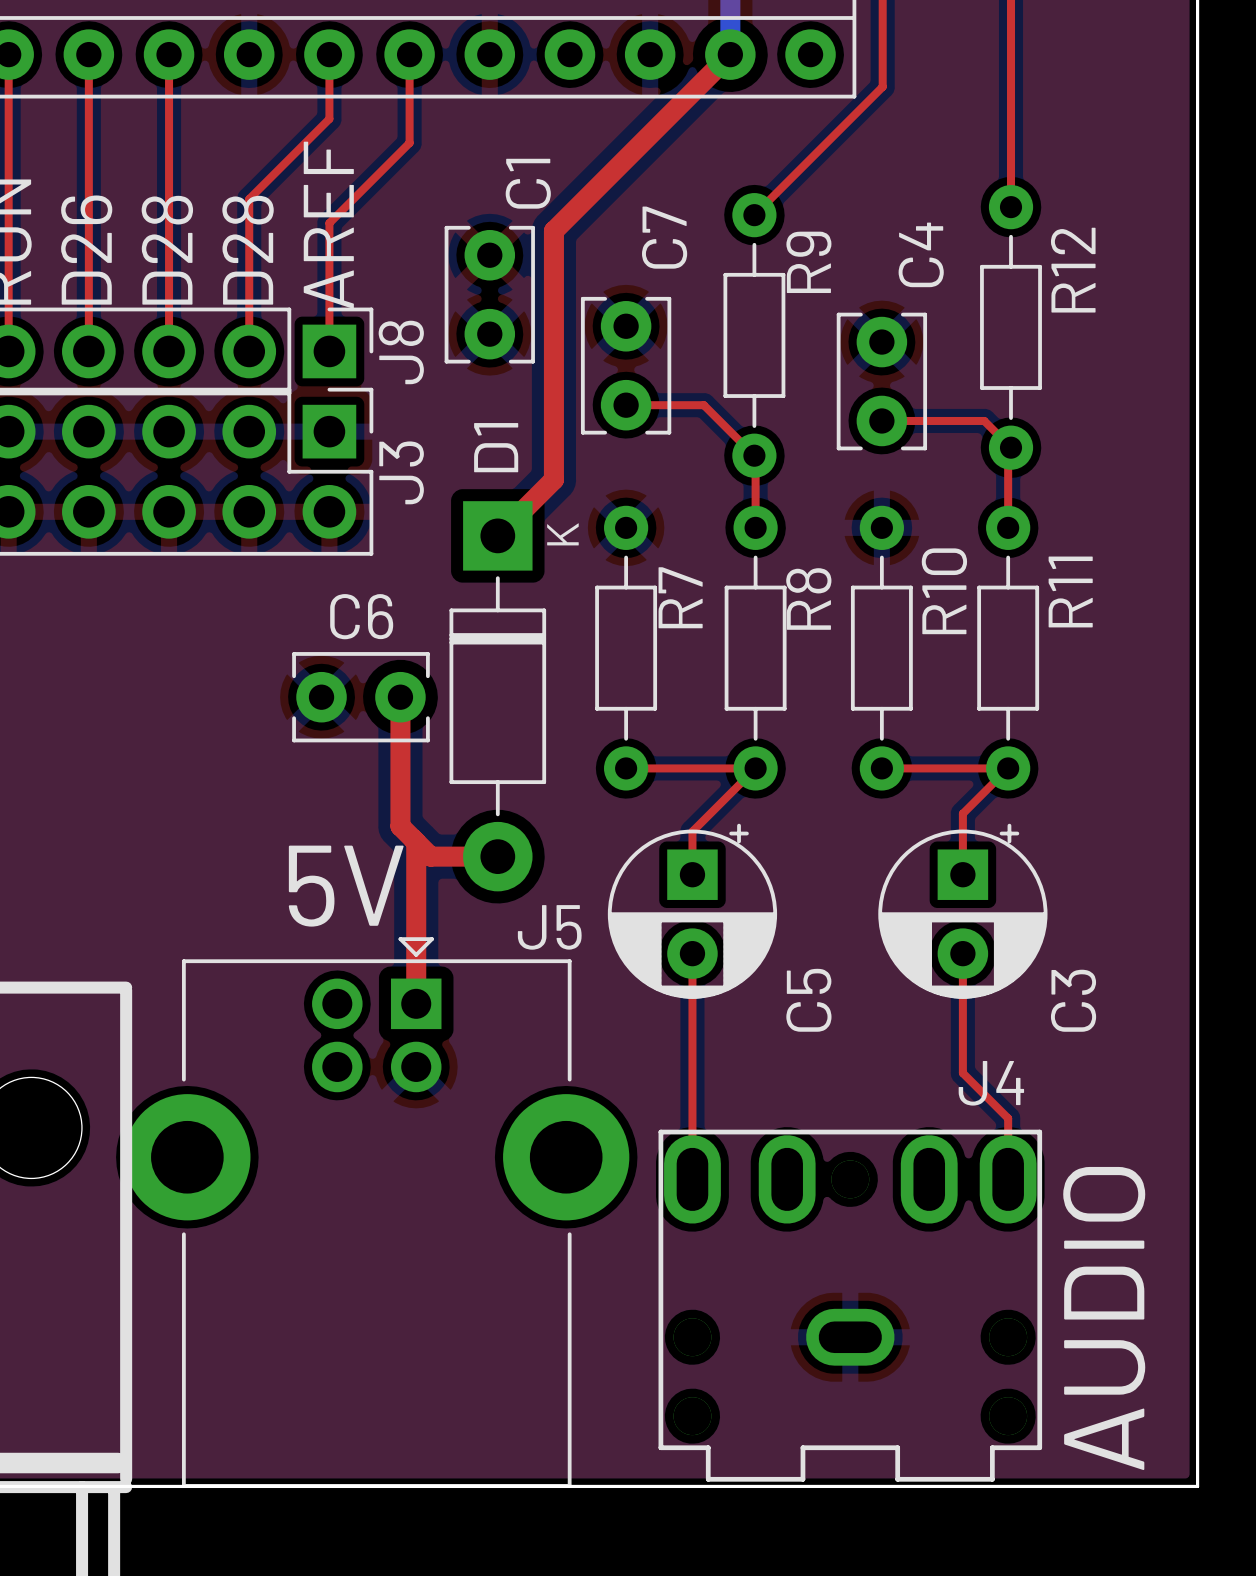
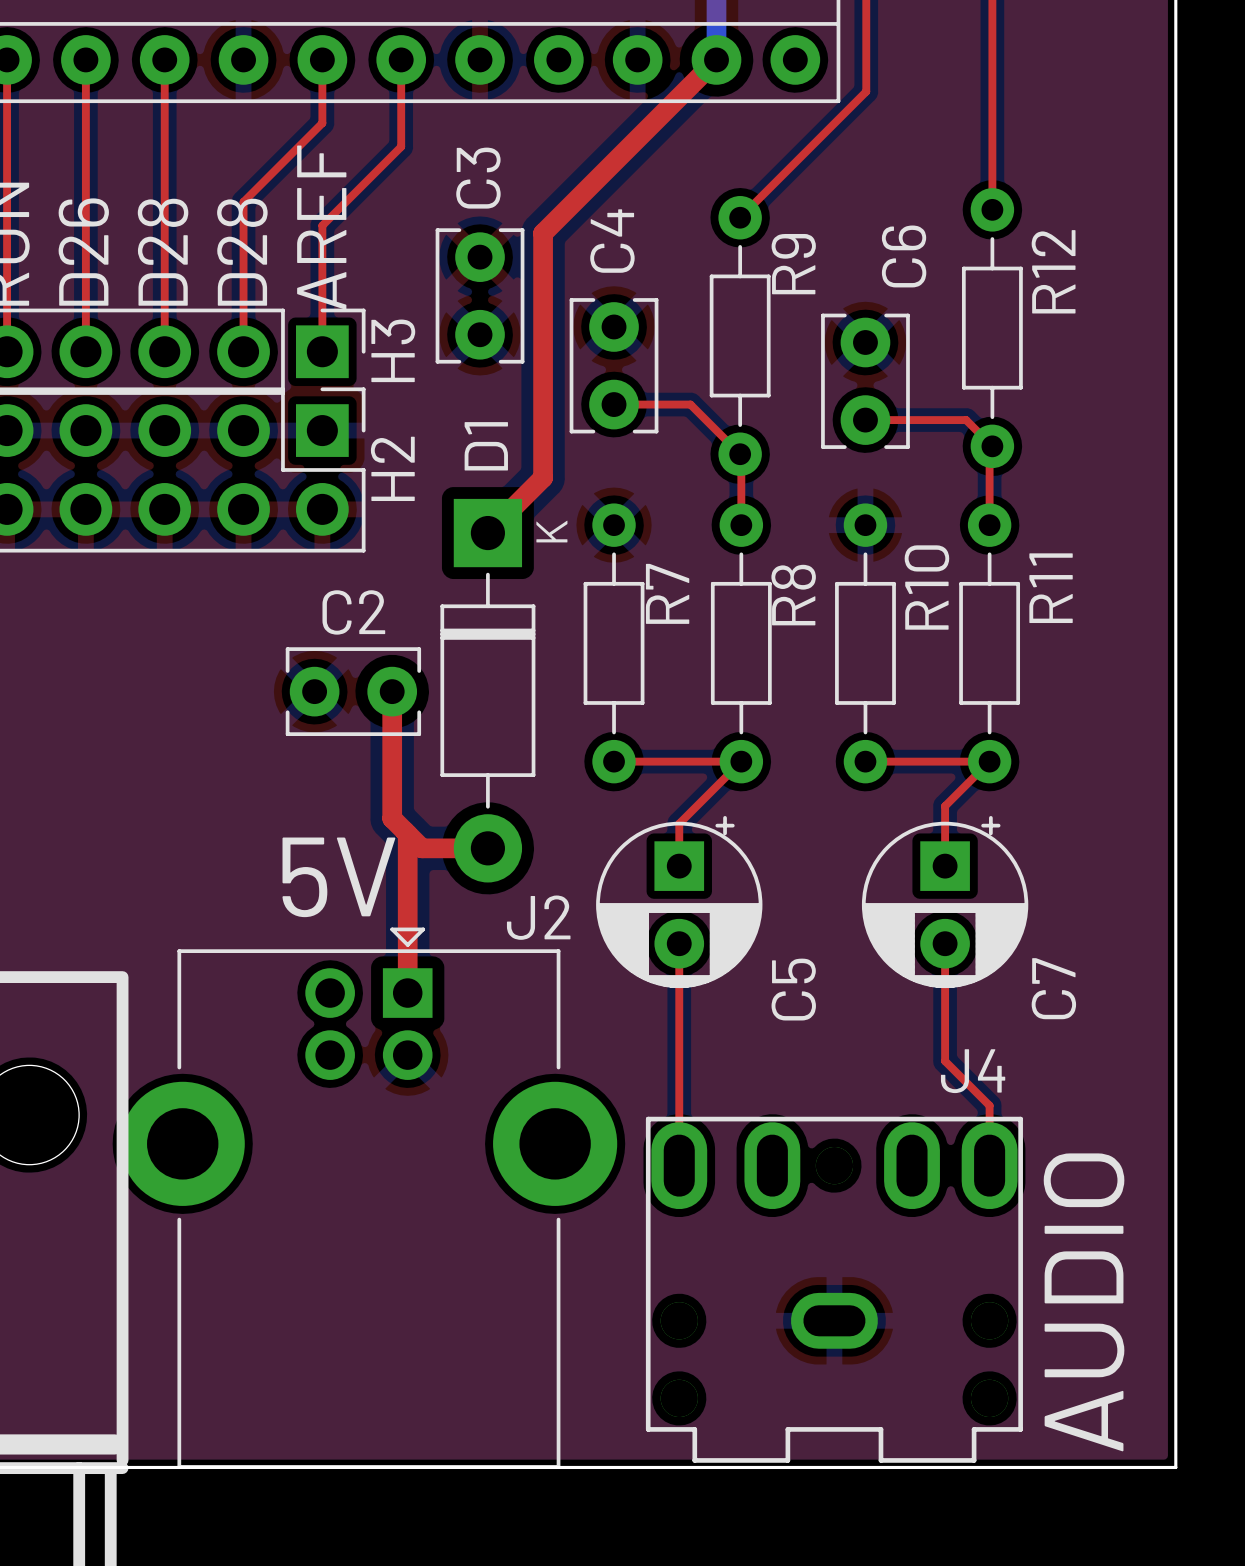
C1 name: C1 (528, 183) -> C3 (478, 178)
C7 name: C7 (664, 237) -> C4 (612, 241)
C4 name: C4 (921, 254) -> C6 (904, 256)
J8 name: J8 (401, 352) -> H3 (393, 350)
J3 name: J3 (401, 472) -> H2 (392, 468)
C6 name: C6 (361, 616) -> C2 (353, 612)
J5 name: J5 (549, 927) -> J2 (538, 917)
C3 name: C3 (1073, 1000) -> C7 (1053, 988)

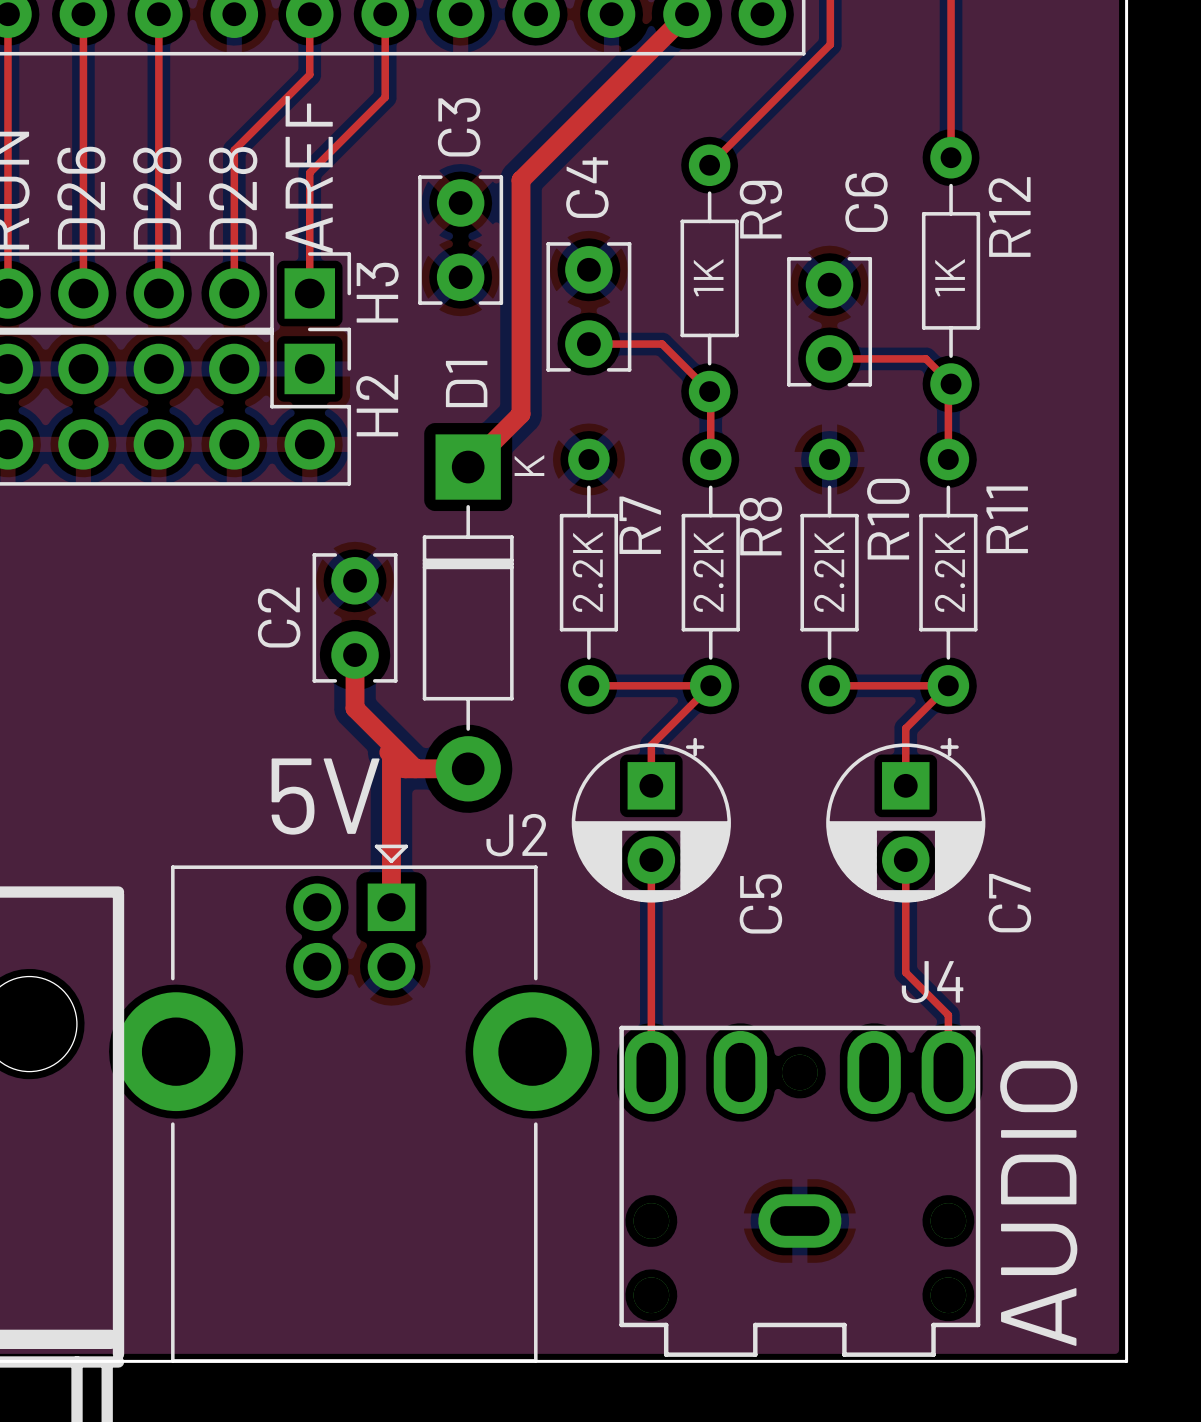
R9 value: none -> 1K (708, 277)
R12 value: none -> 1K (950, 277)
C2 name position: C2 (353, 612) -> C2 (279, 617)
R7 value: none -> 2.2K (587, 572)
R8 value: none -> 2.2K (708, 572)
R10 value: none -> 2.2K (829, 572)
R11 value: none -> 2.2K (949, 572)
C2 rotation: 0° (353, 691) -> 90° clockwise (355, 617)
top track: (392, 691) (392, 818) (404, 831) -> none
top track: none -> (355, 655) (355, 708) (415, 768)

